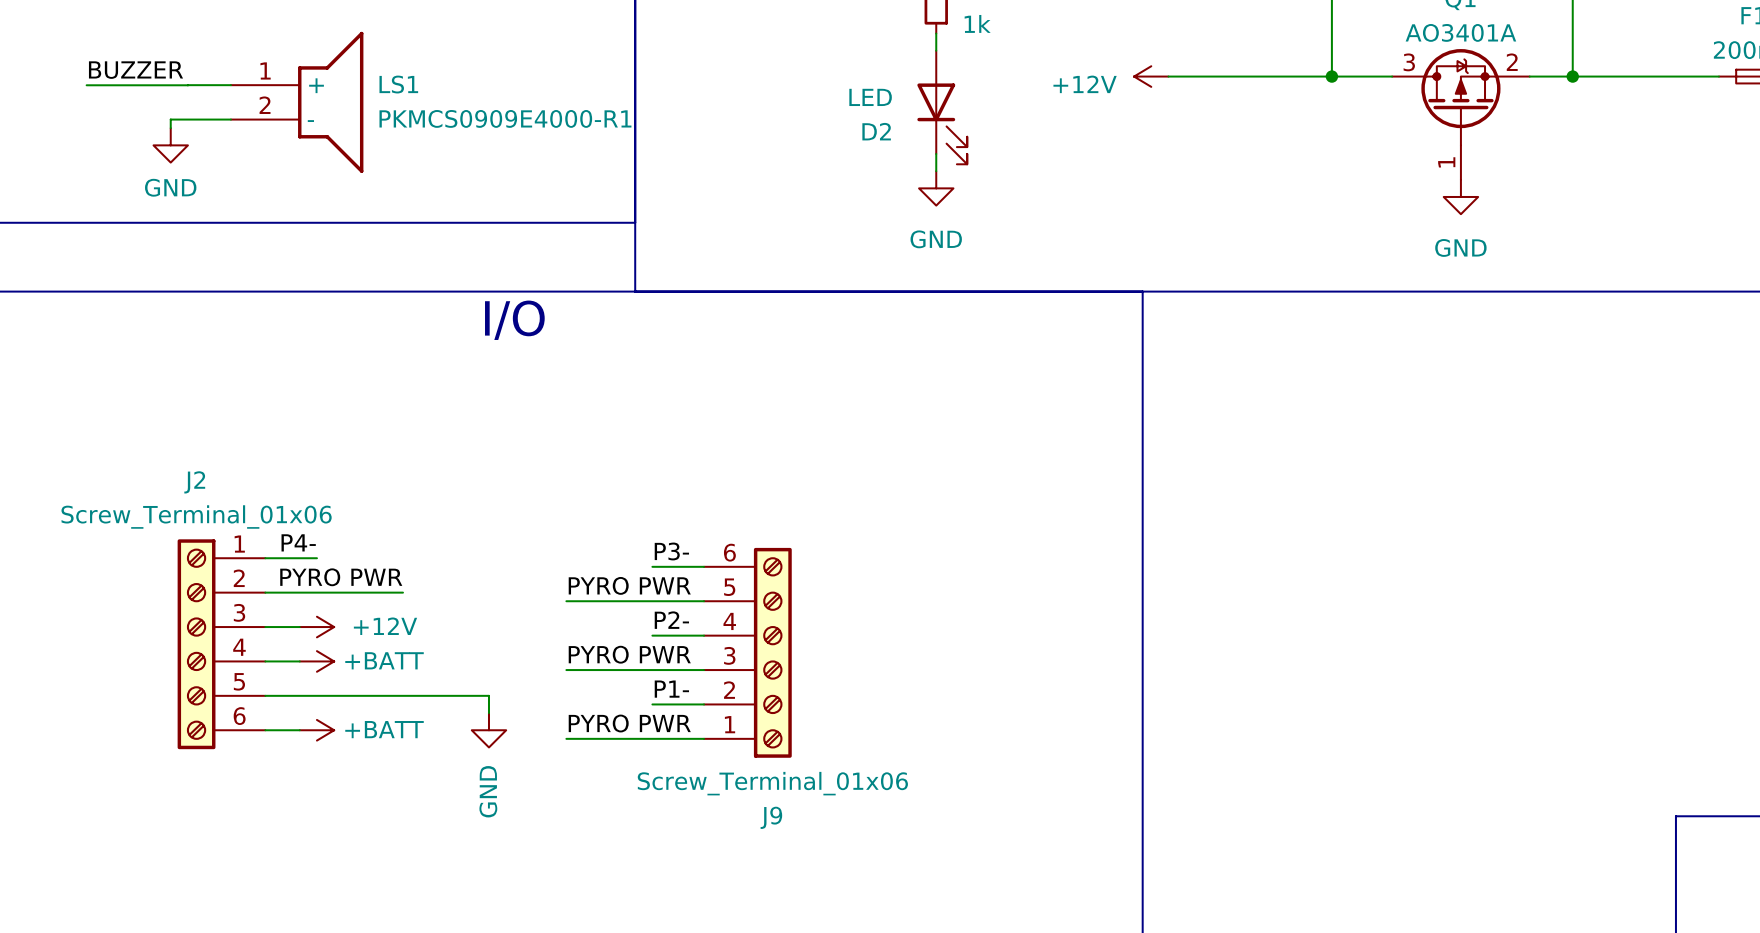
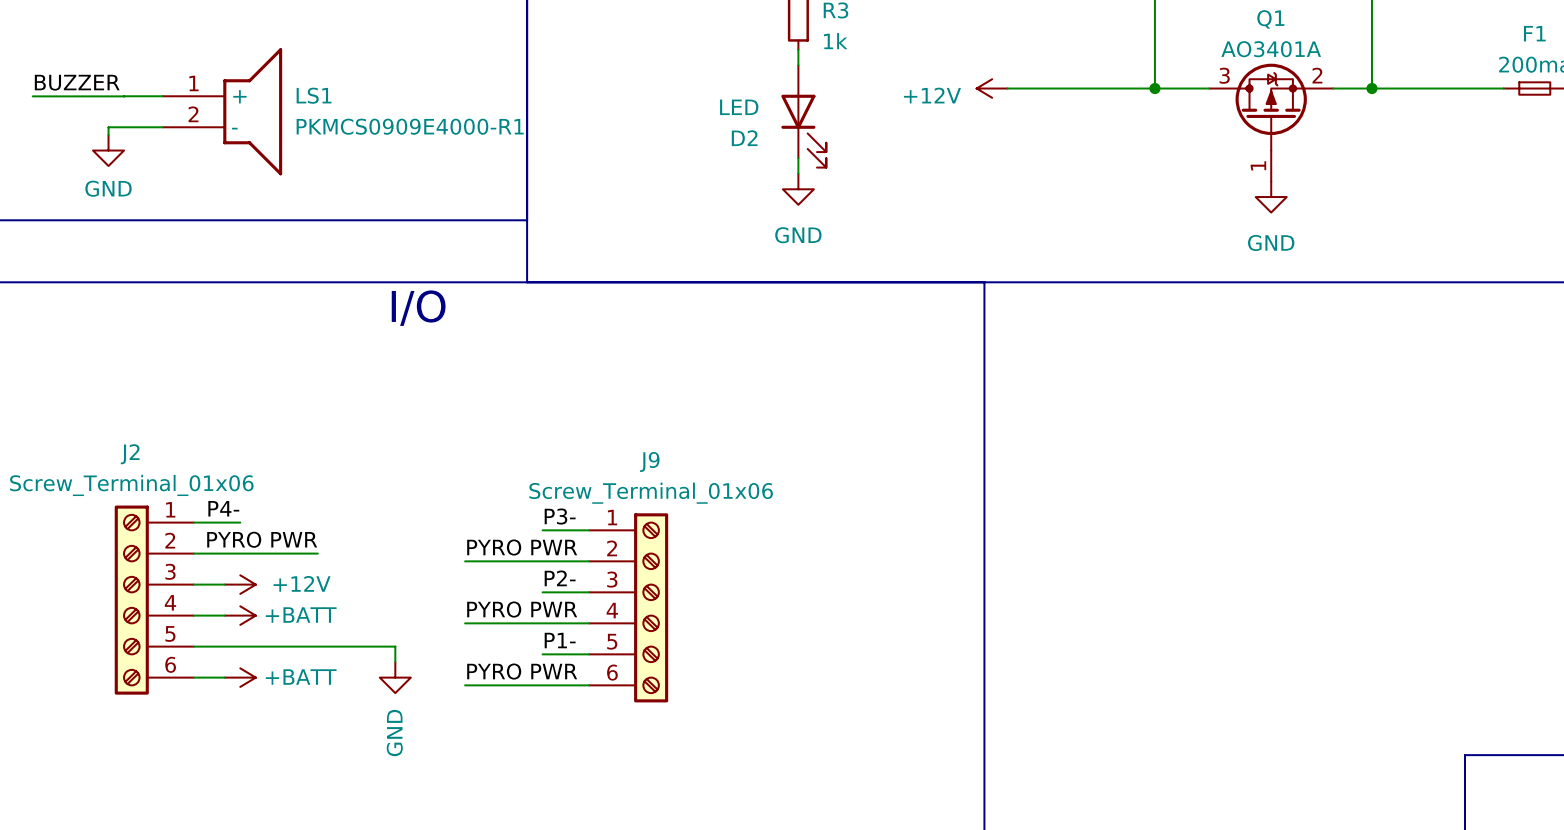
J9 flip: as is (772, 652) -> up-down (651, 607)

